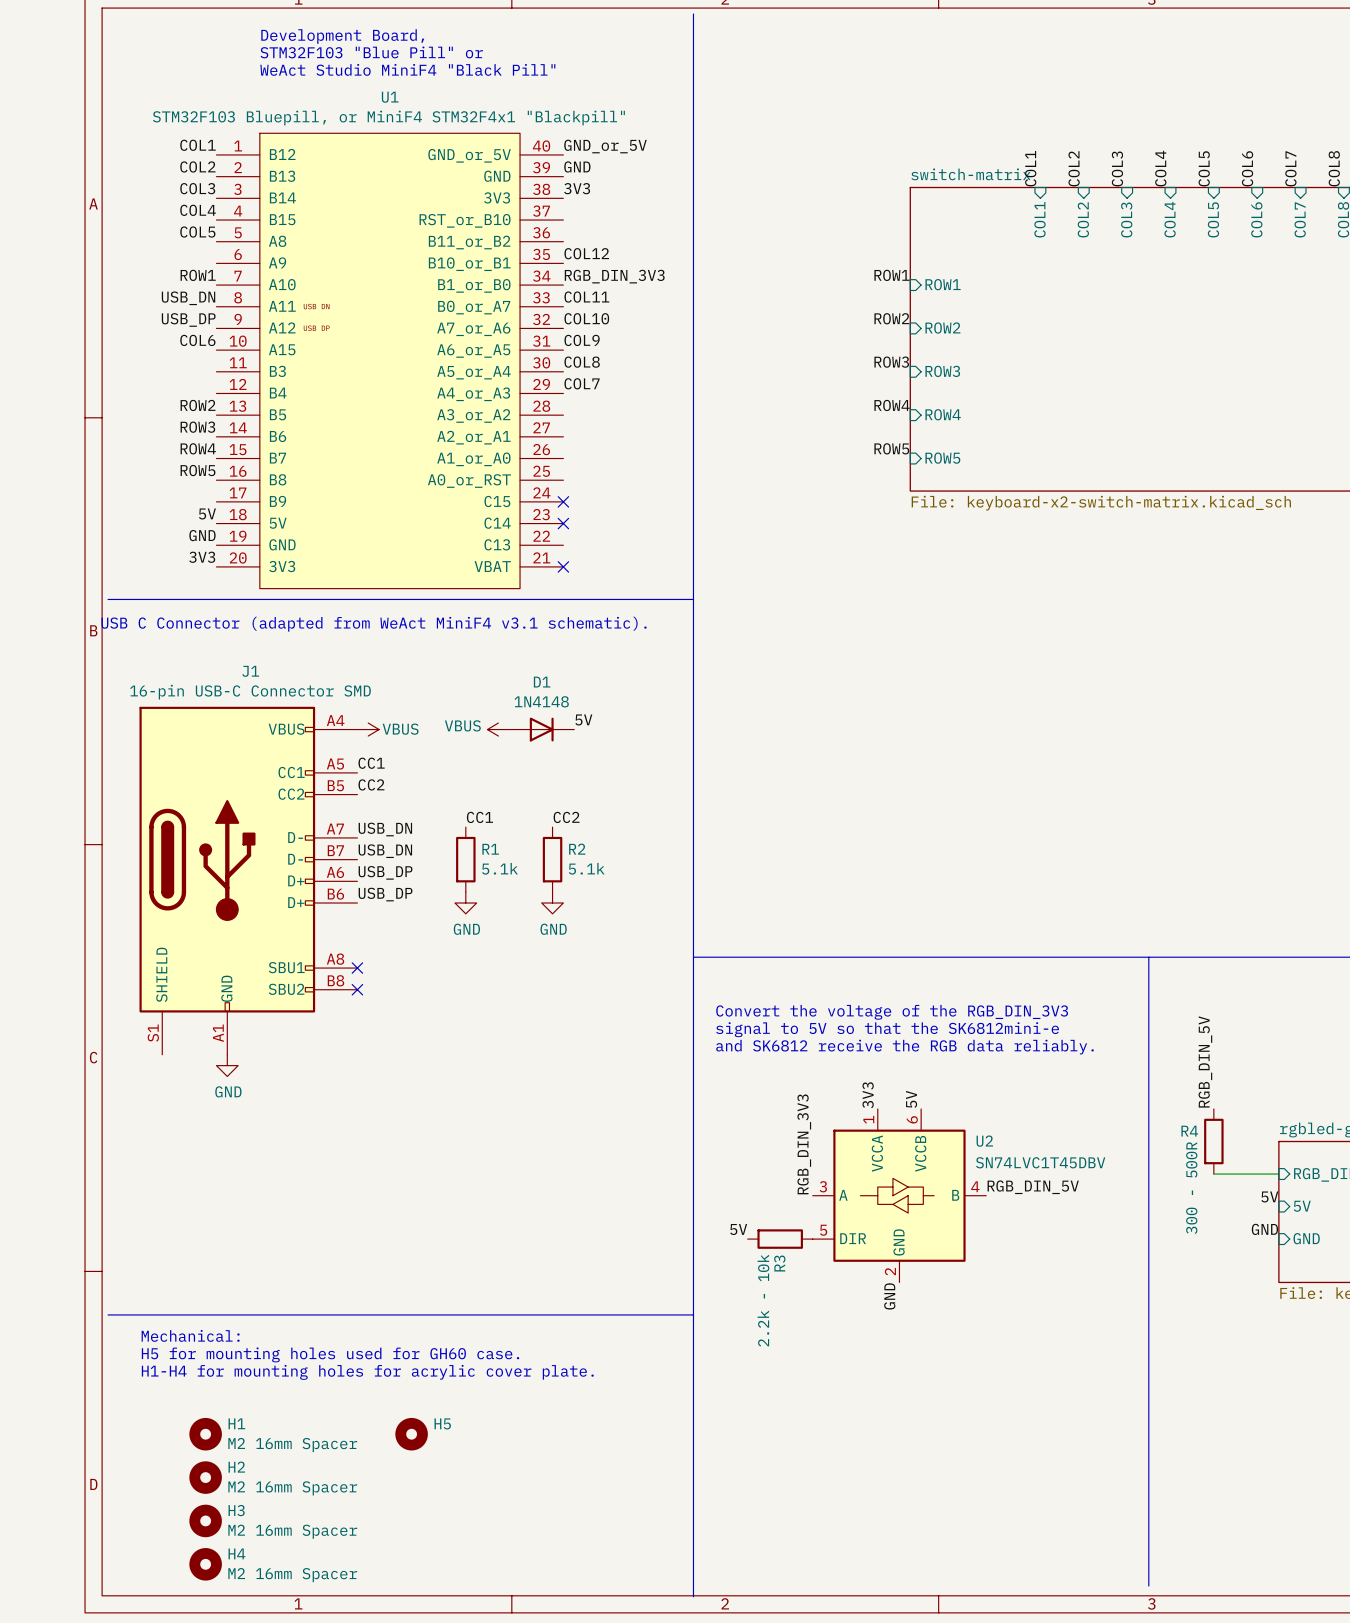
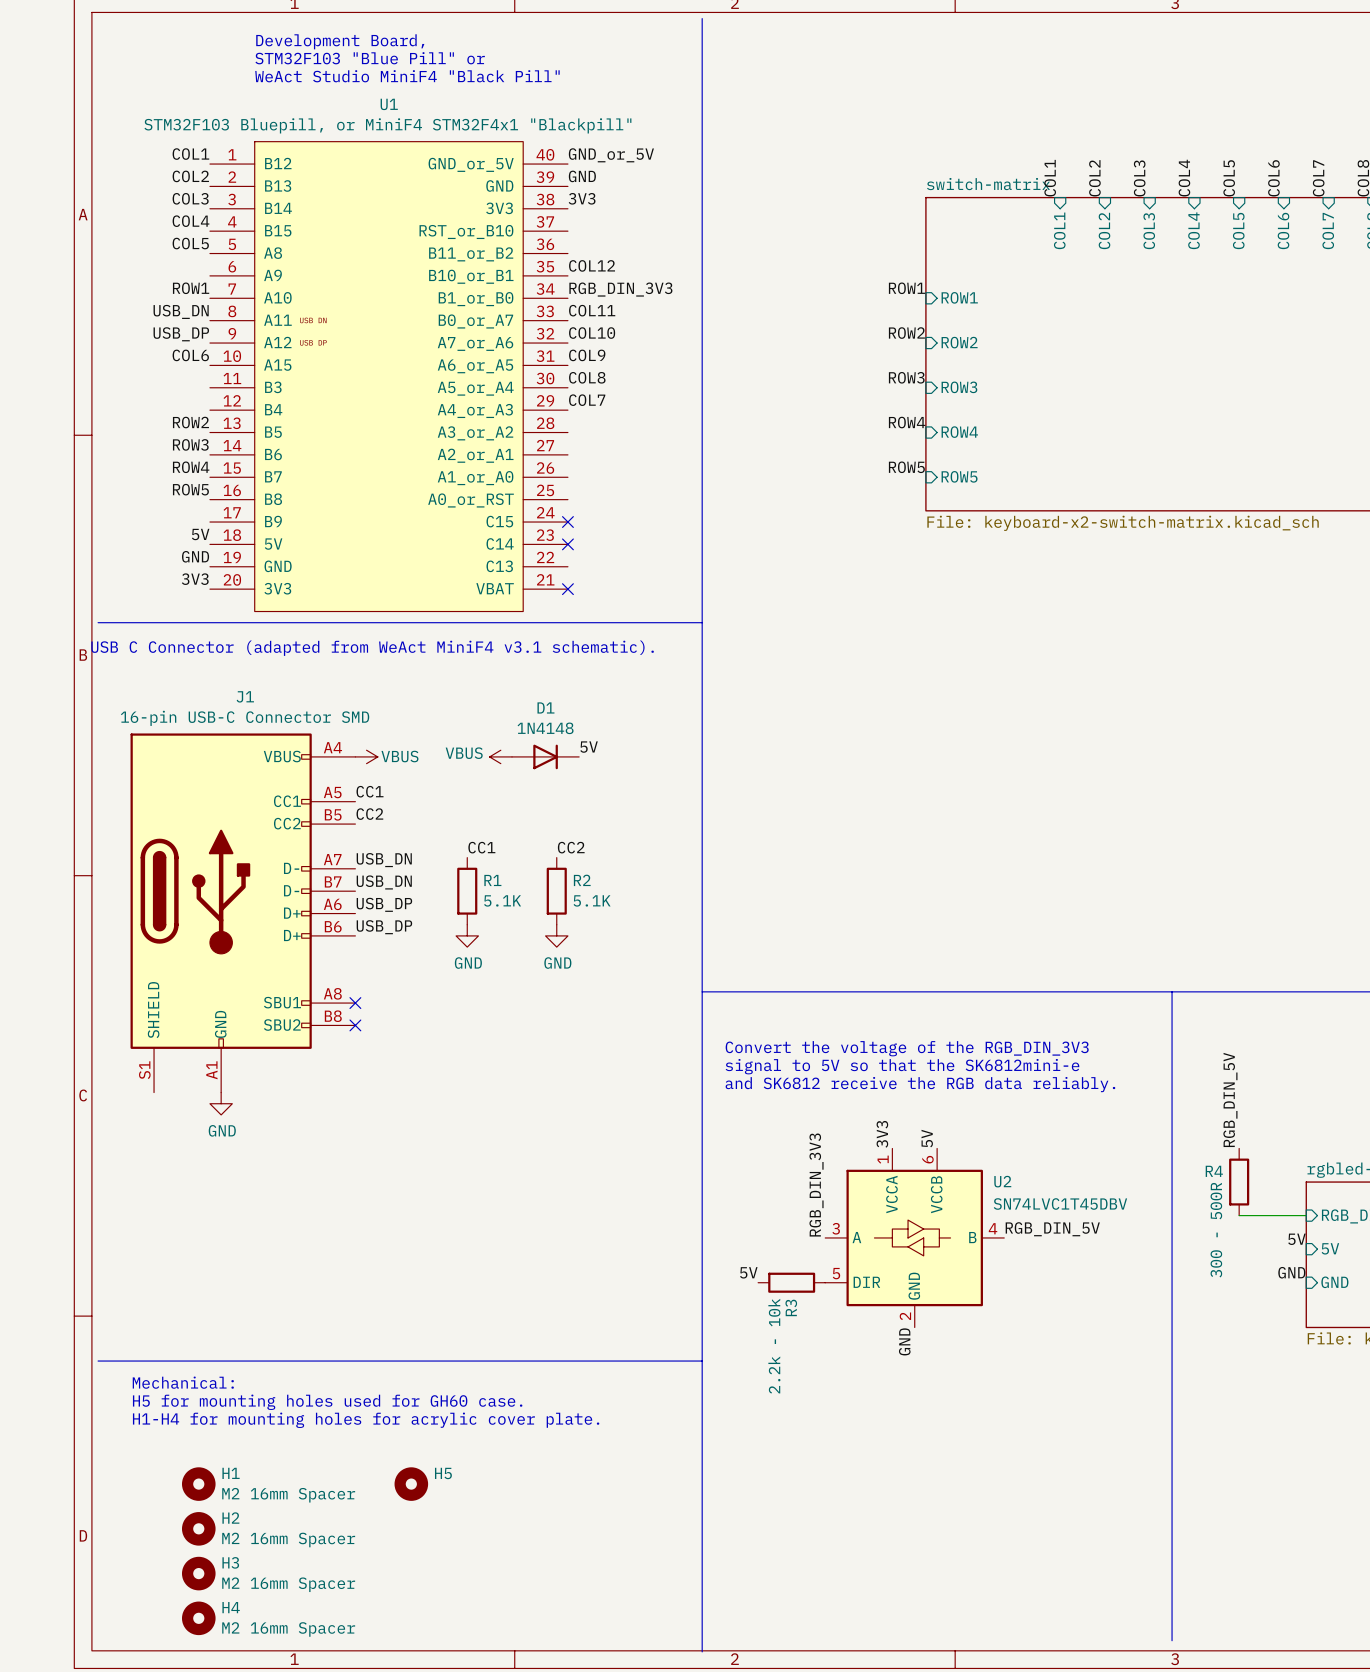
R1 value: 5.1k (500, 868) -> 5.1K (502, 900)
R2 value: 5.1k (586, 868) -> 5.1K (592, 900)

